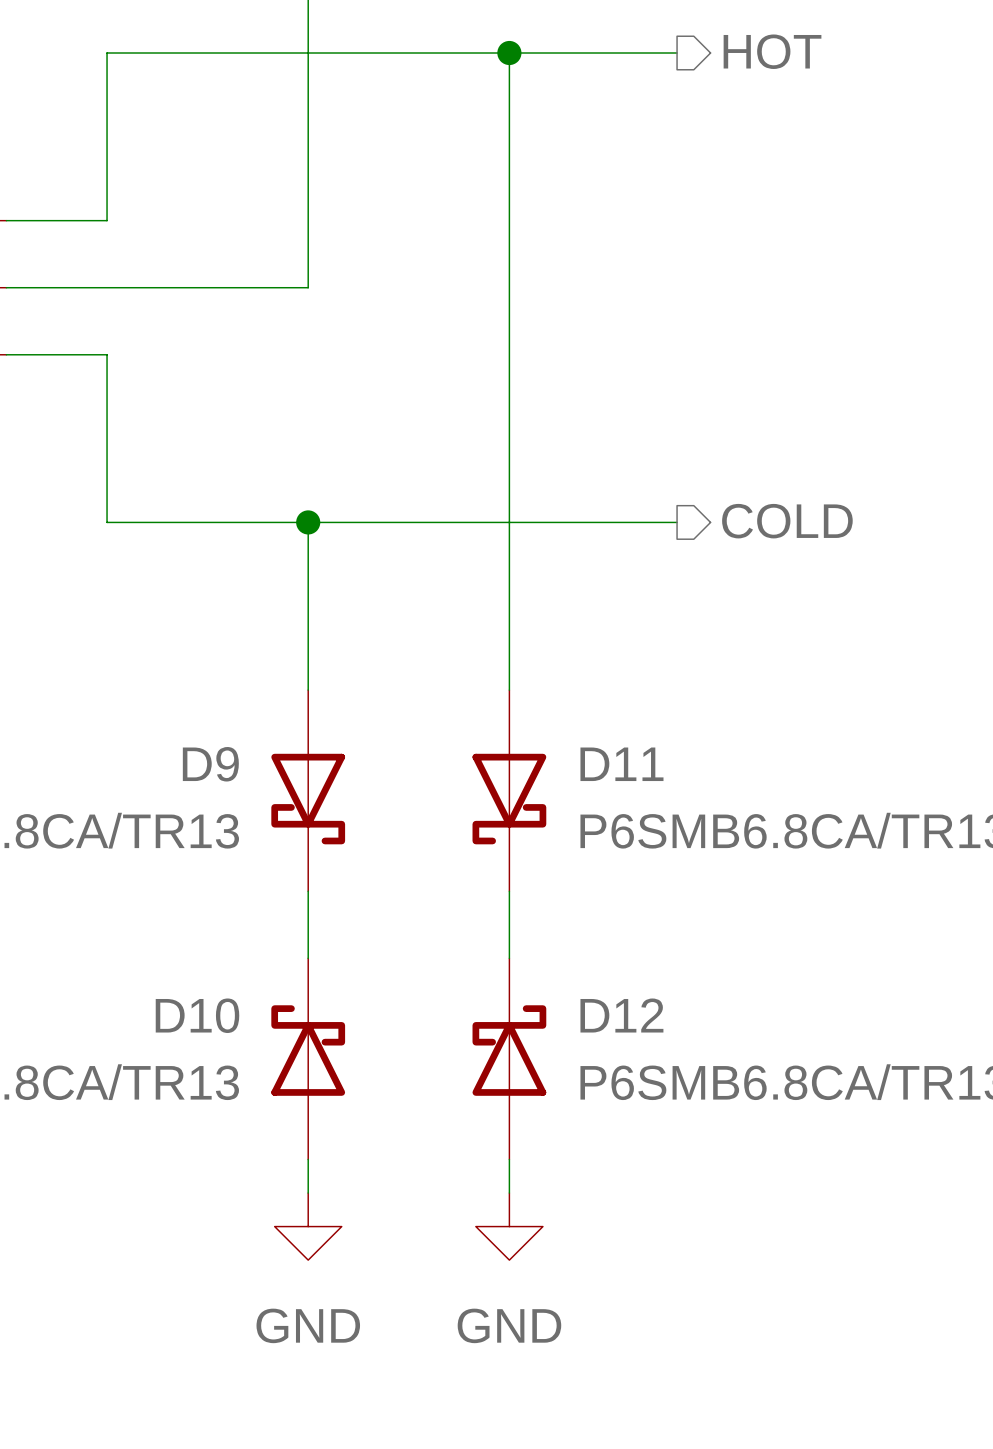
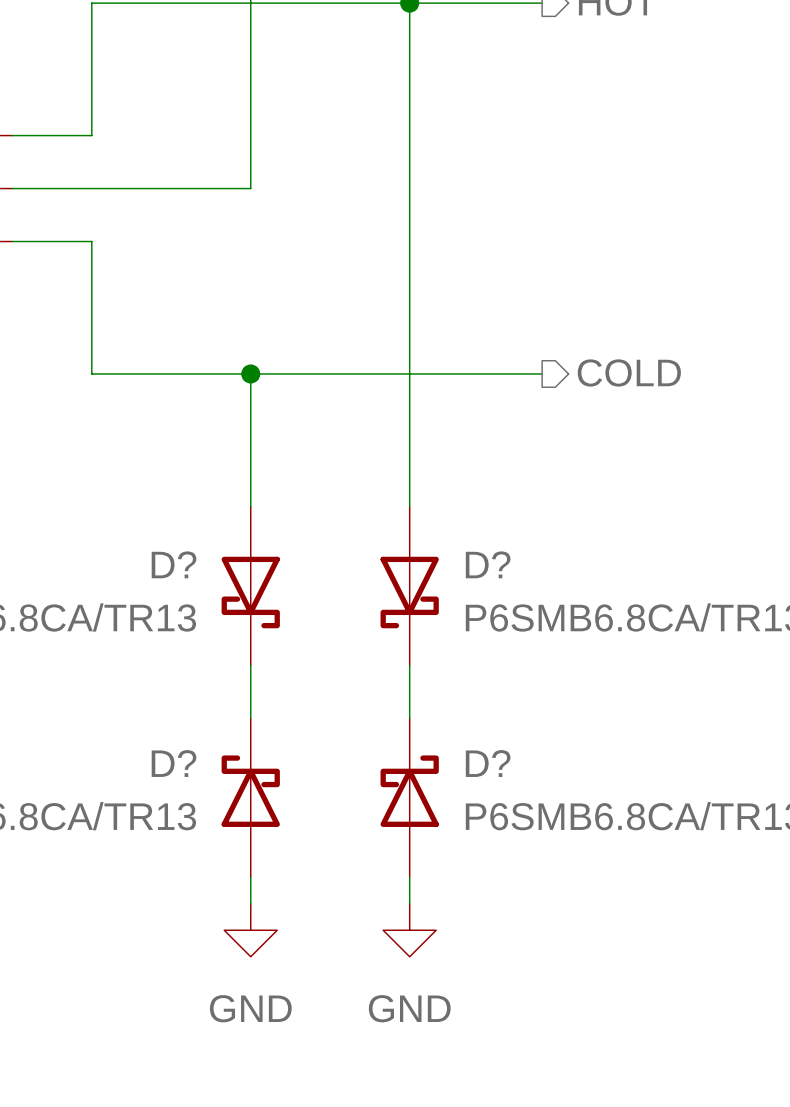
D9 name: D9 (210, 764) -> D? (174, 564)
D11 name: D11 (621, 764) -> D? (488, 564)
D10 name: D10 (197, 1015) -> D? (174, 763)
D12 name: D12 (621, 1015) -> D? (488, 763)

